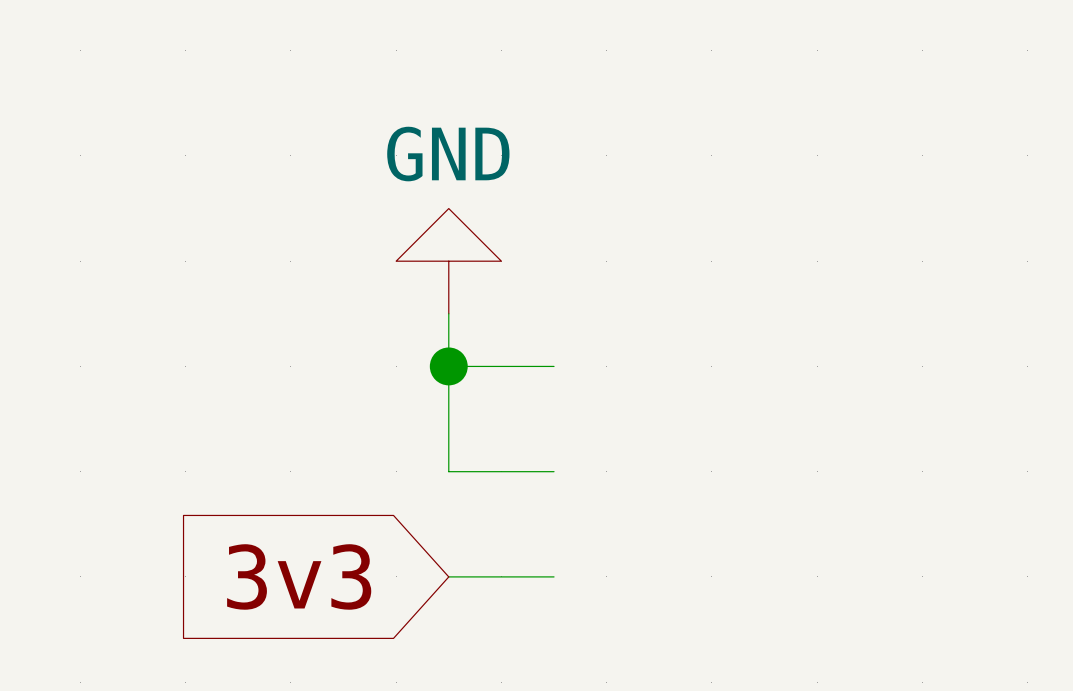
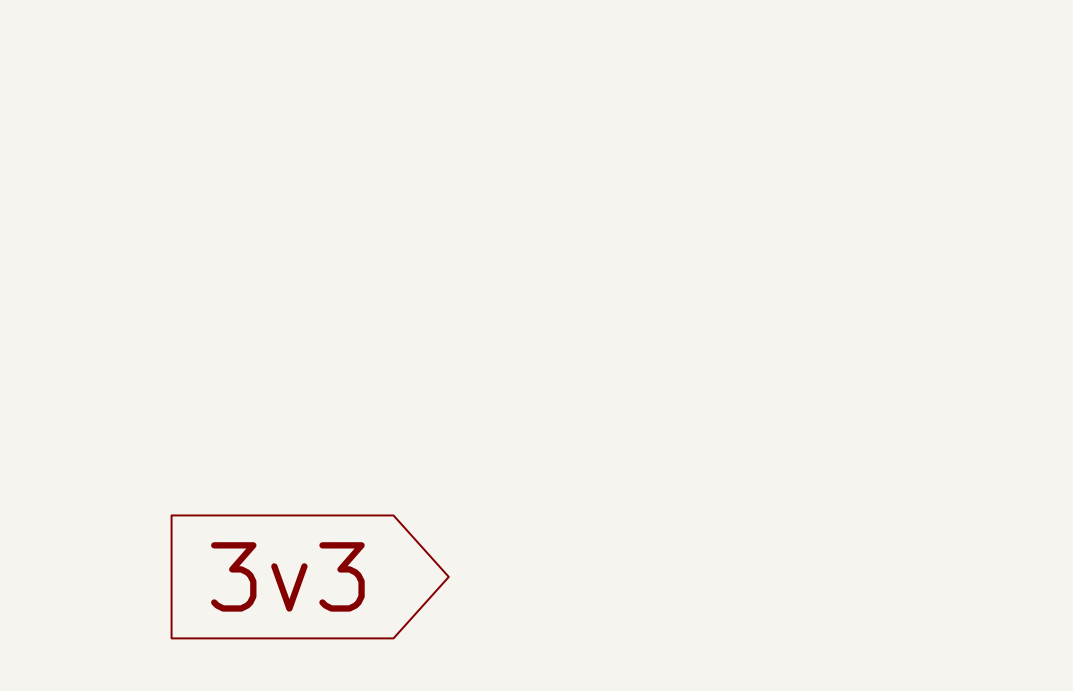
power symbol: GND (448, 261) -> none
wire: (448, 313) (448, 471) (554, 471) -> none
wire: (448, 366) (554, 366) -> none
junction: (448, 366) -> none
wire: (448, 576) (554, 576) -> none

